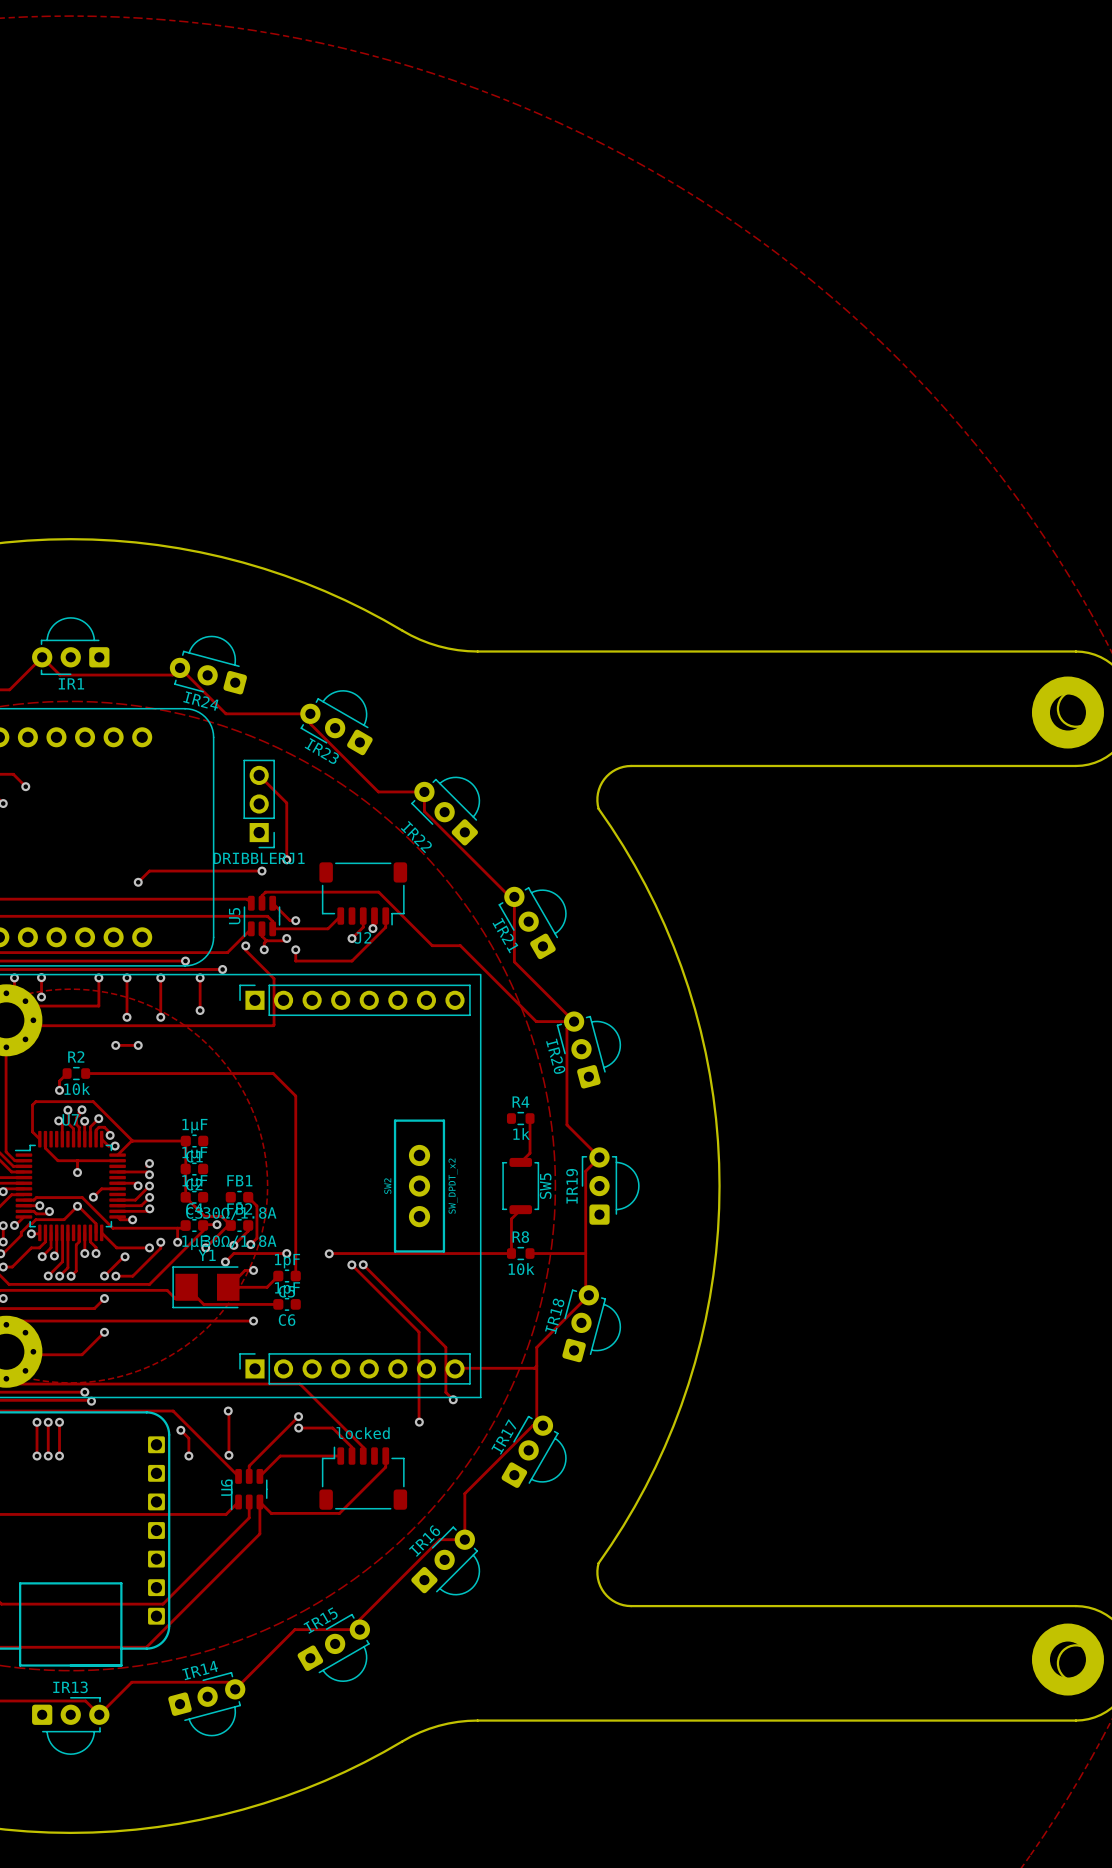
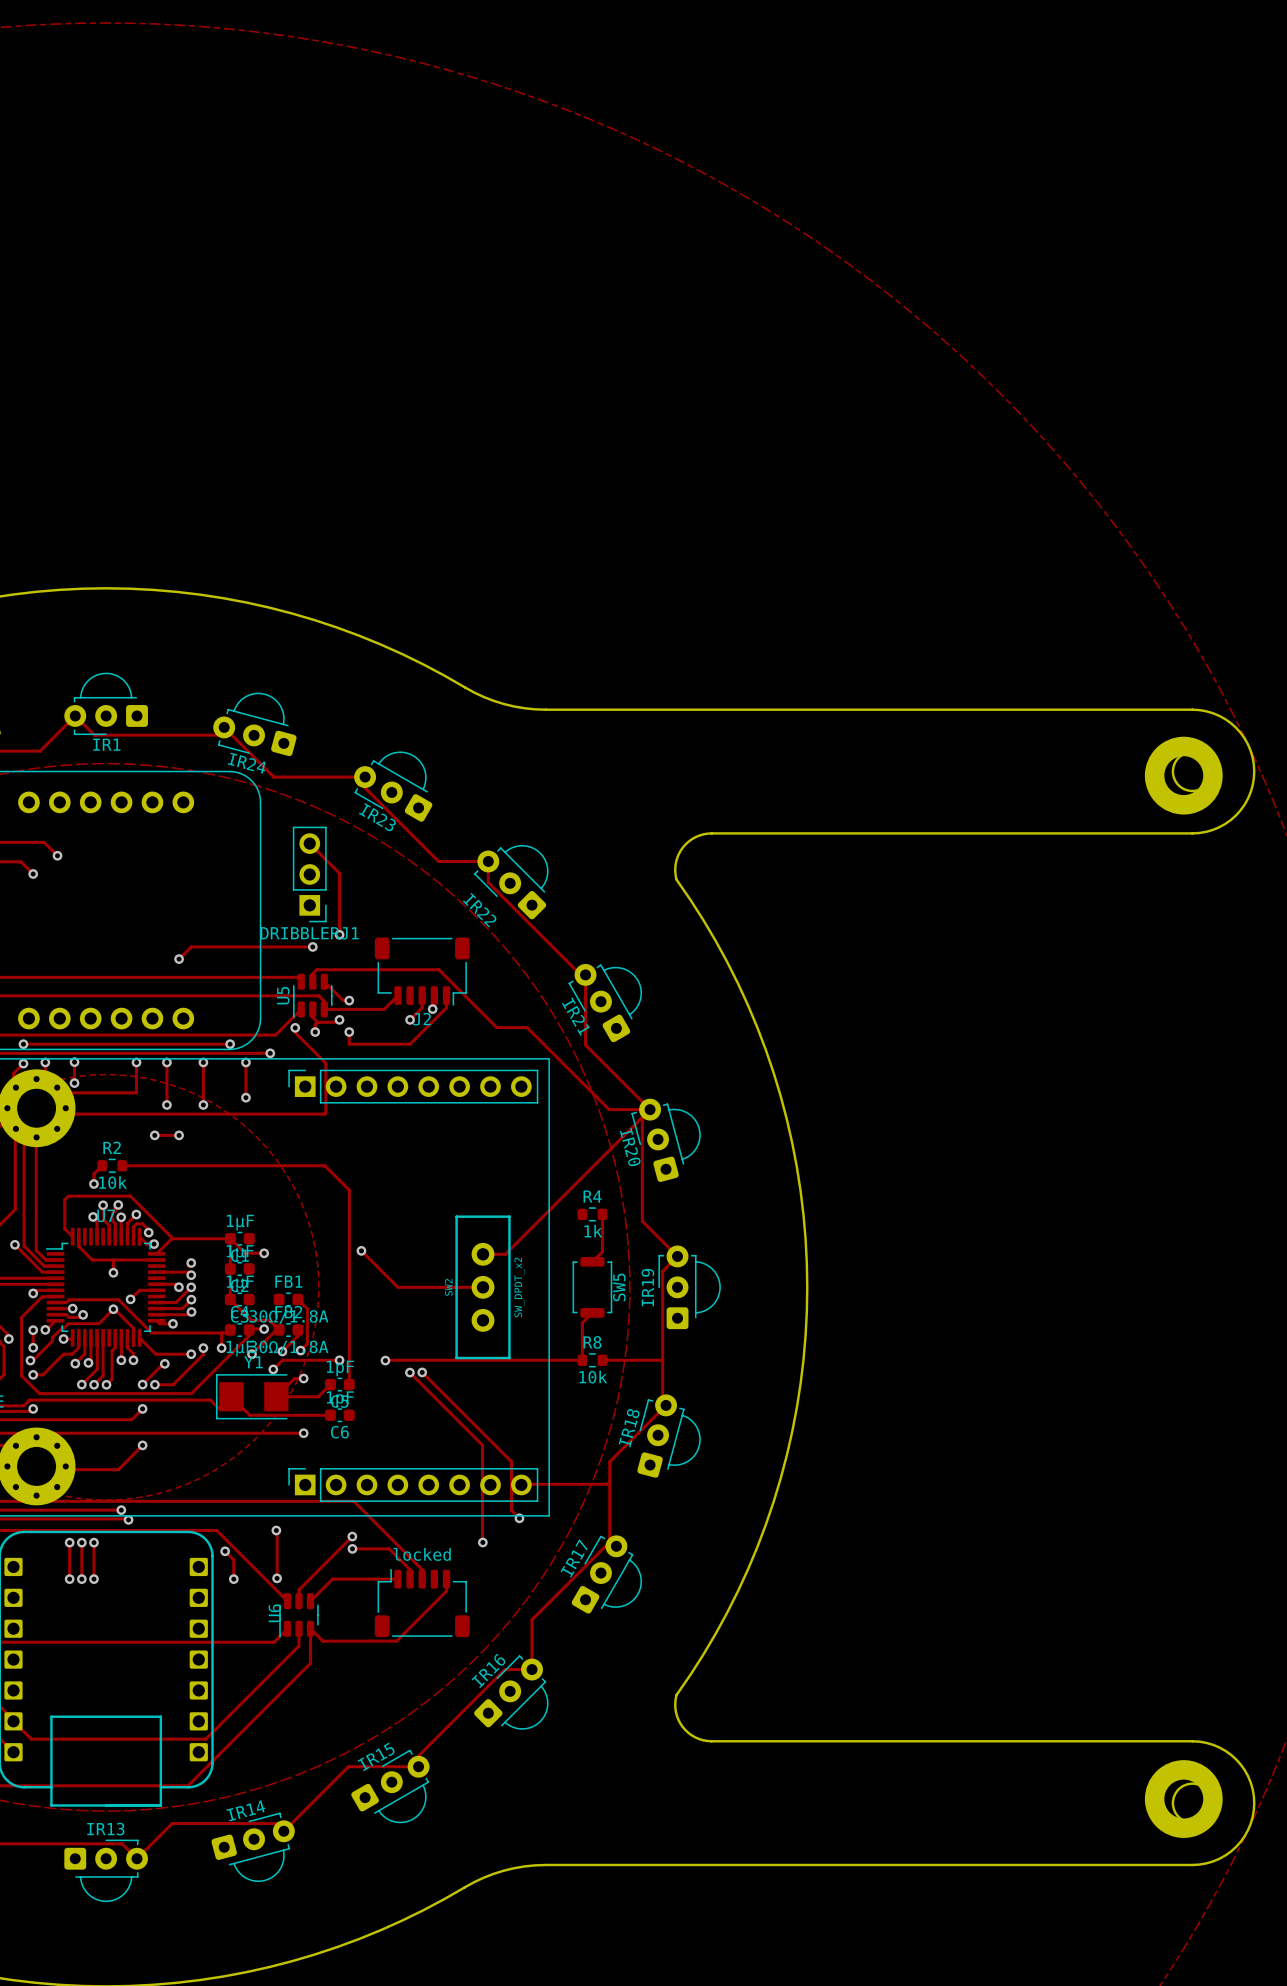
track: none -> (642, 1117) (505, 1254) (483, 1254)
track: none -> (230, 1238) (245, 1253) (264, 1253)
track: none -> (361, 1250) (397, 1287) (483, 1287)
via: none -> (361, 1250)
via: none -> (264, 1253)

